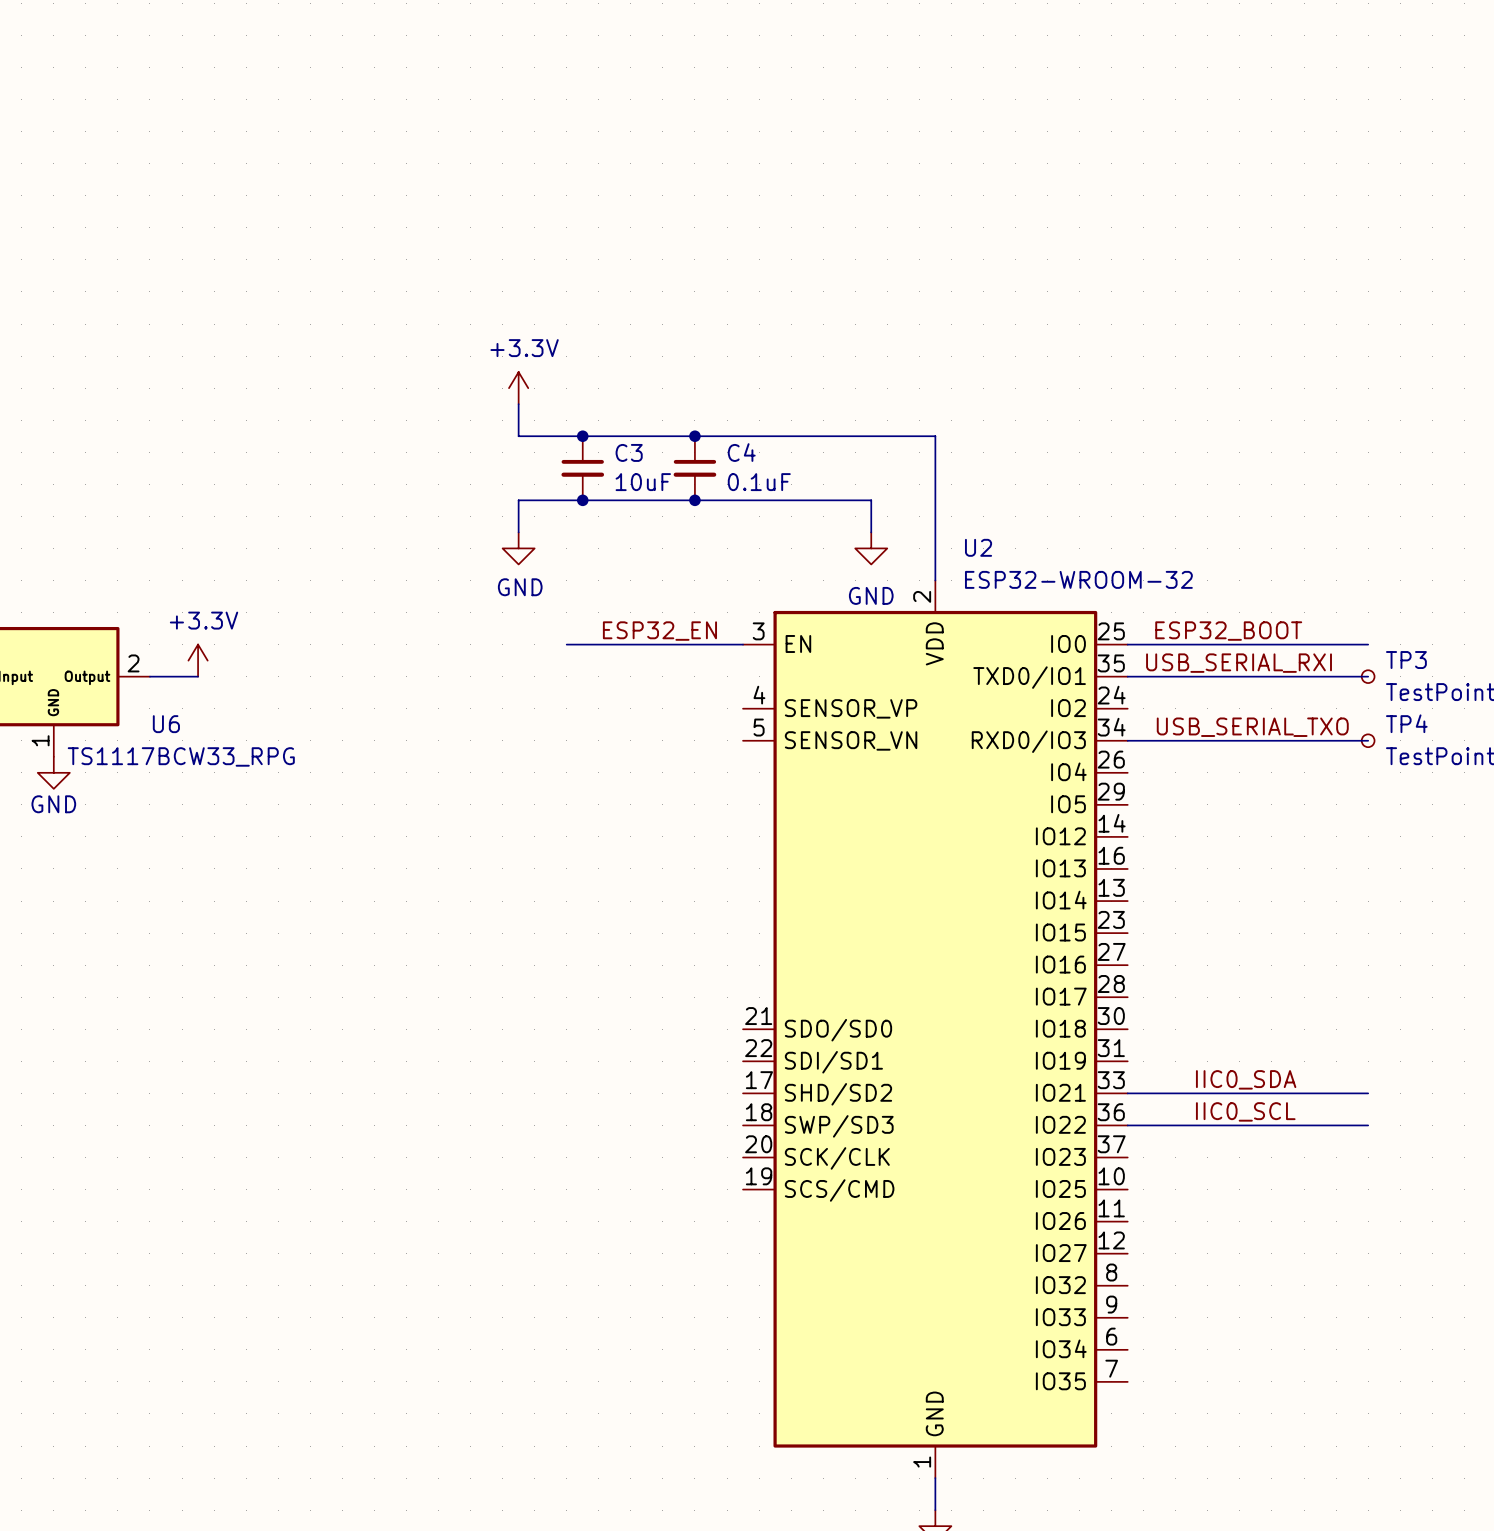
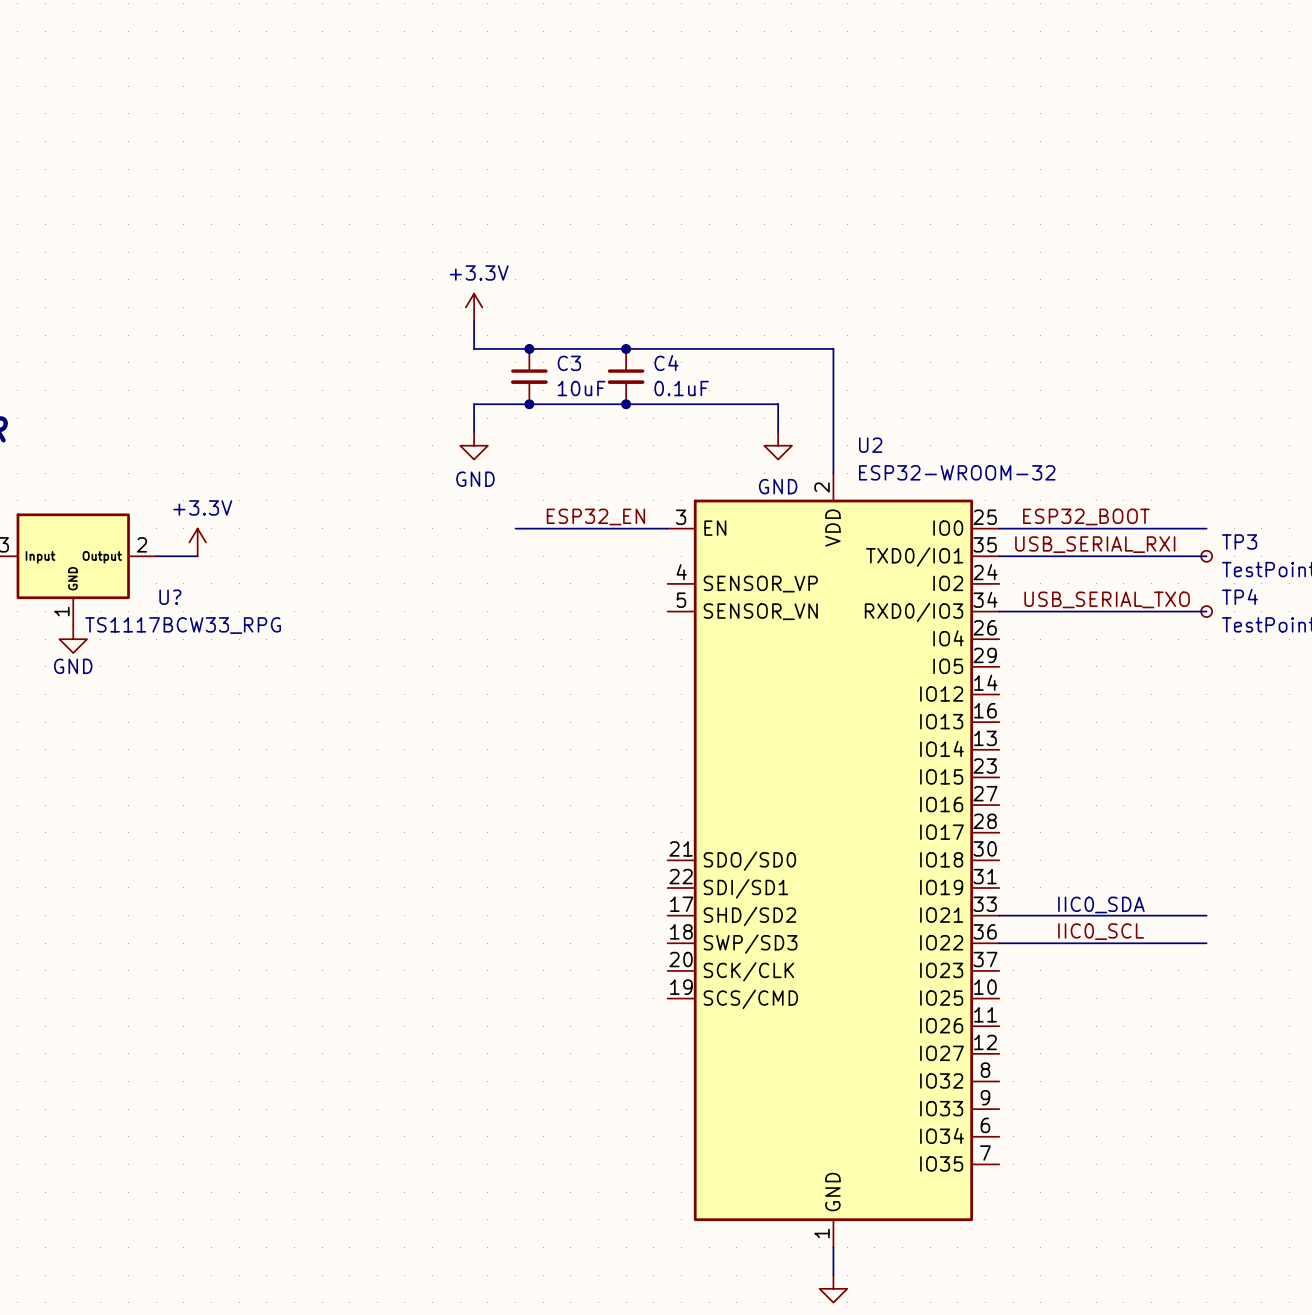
U6 name: U6 (166, 724) -> U? (170, 597)
label: IIC0_SDA (1246, 1079) -> none
text: none -> IIC0_SDA (1101, 904)

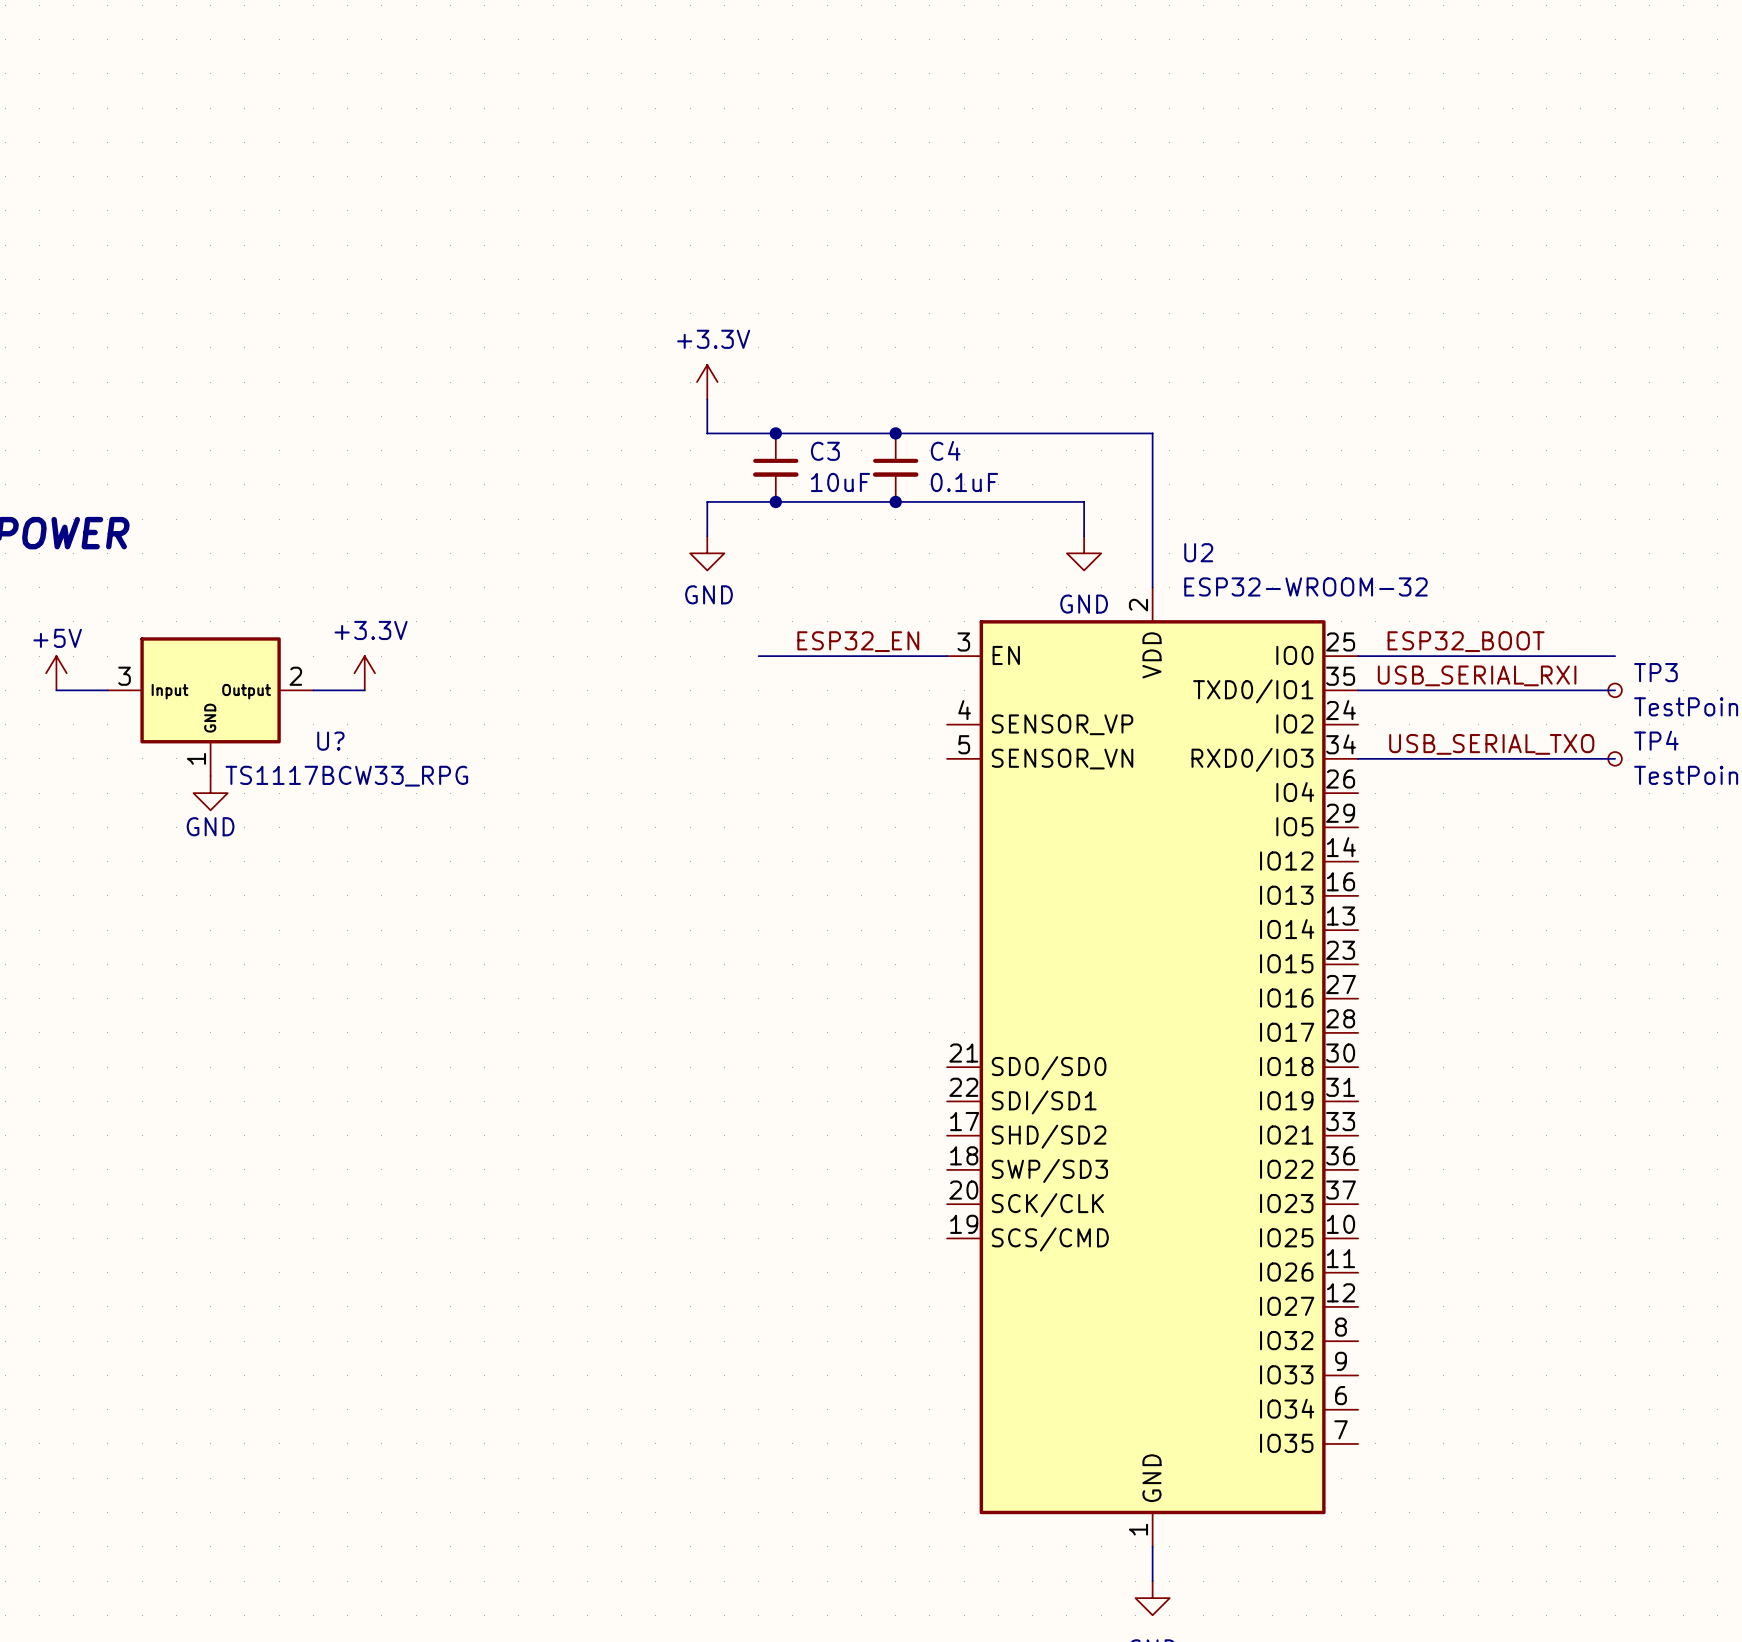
text: IIC0_SDA (1101, 904) -> none
wire: (999, 915) (1206, 915) -> none
label: IIC0_SCL (1101, 931) -> none
wire: (999, 943) (1206, 943) -> none

